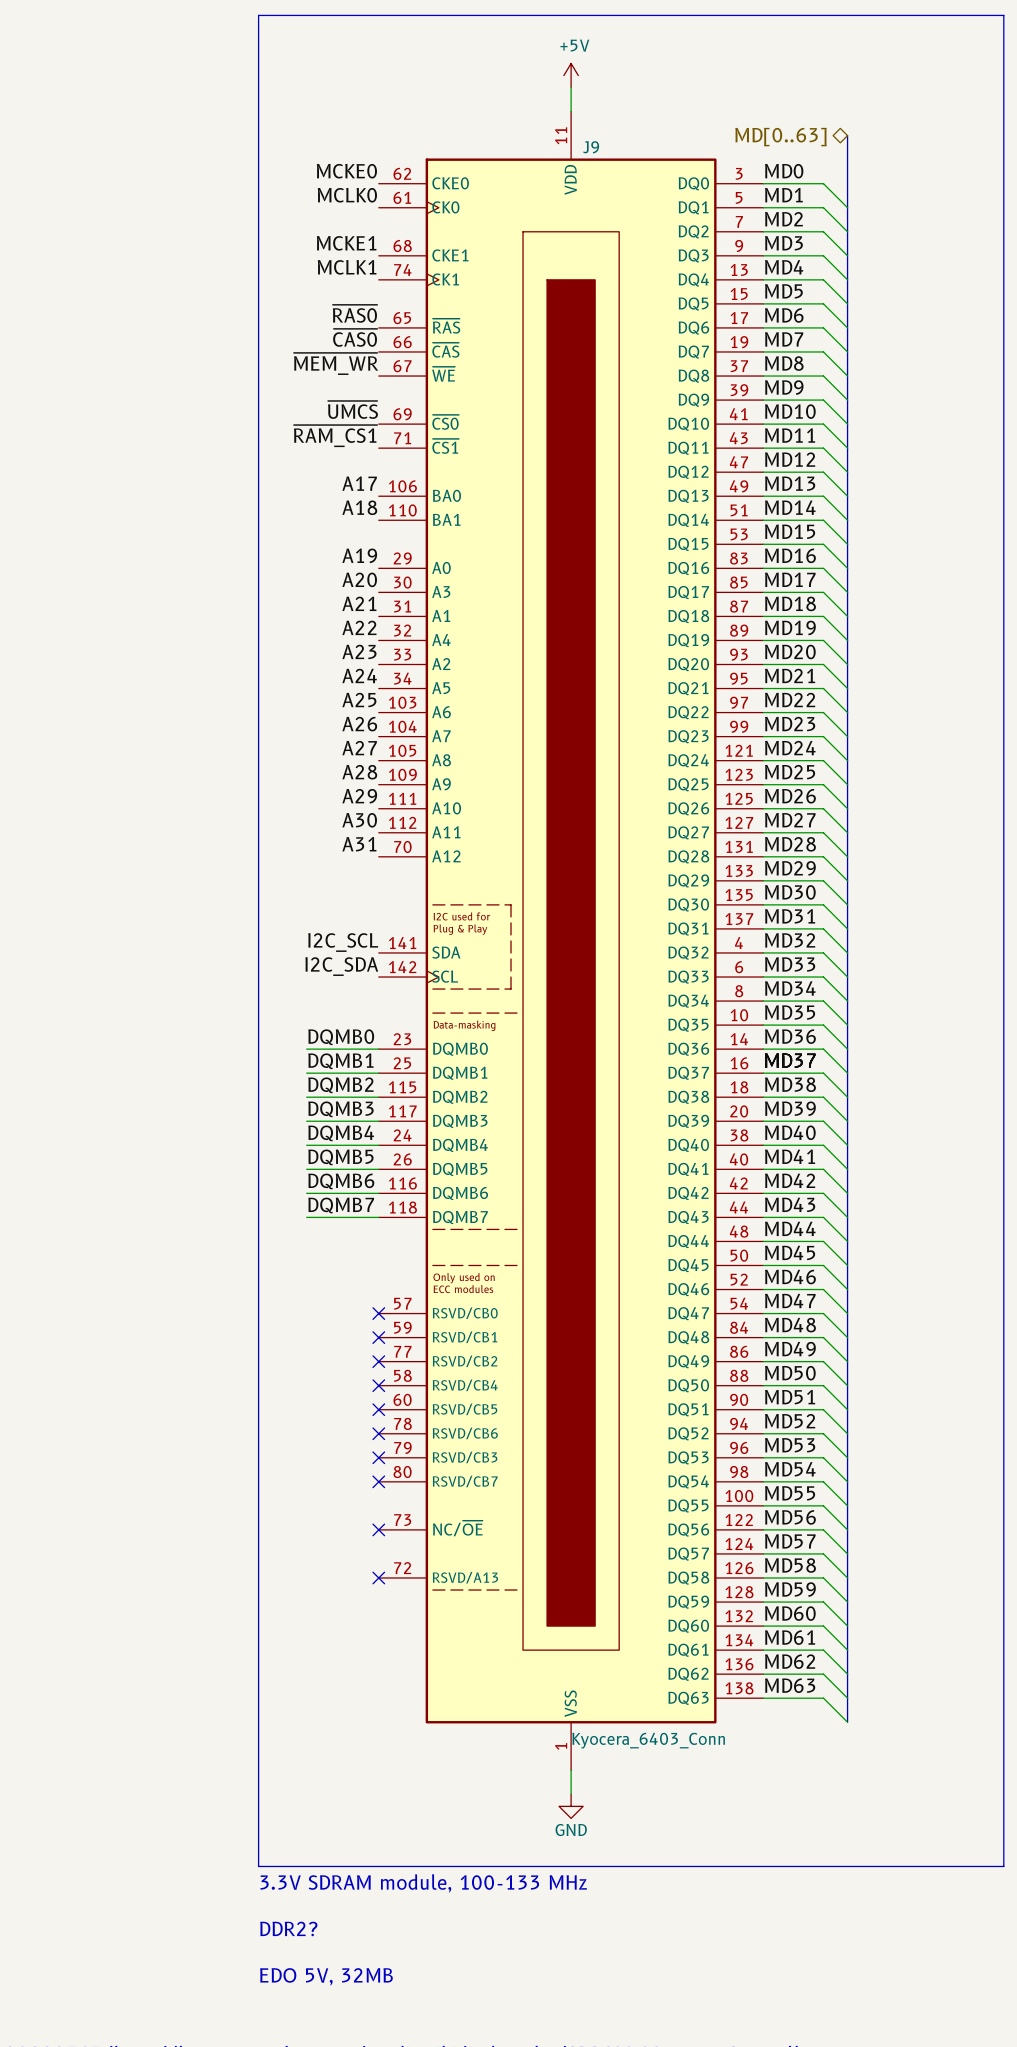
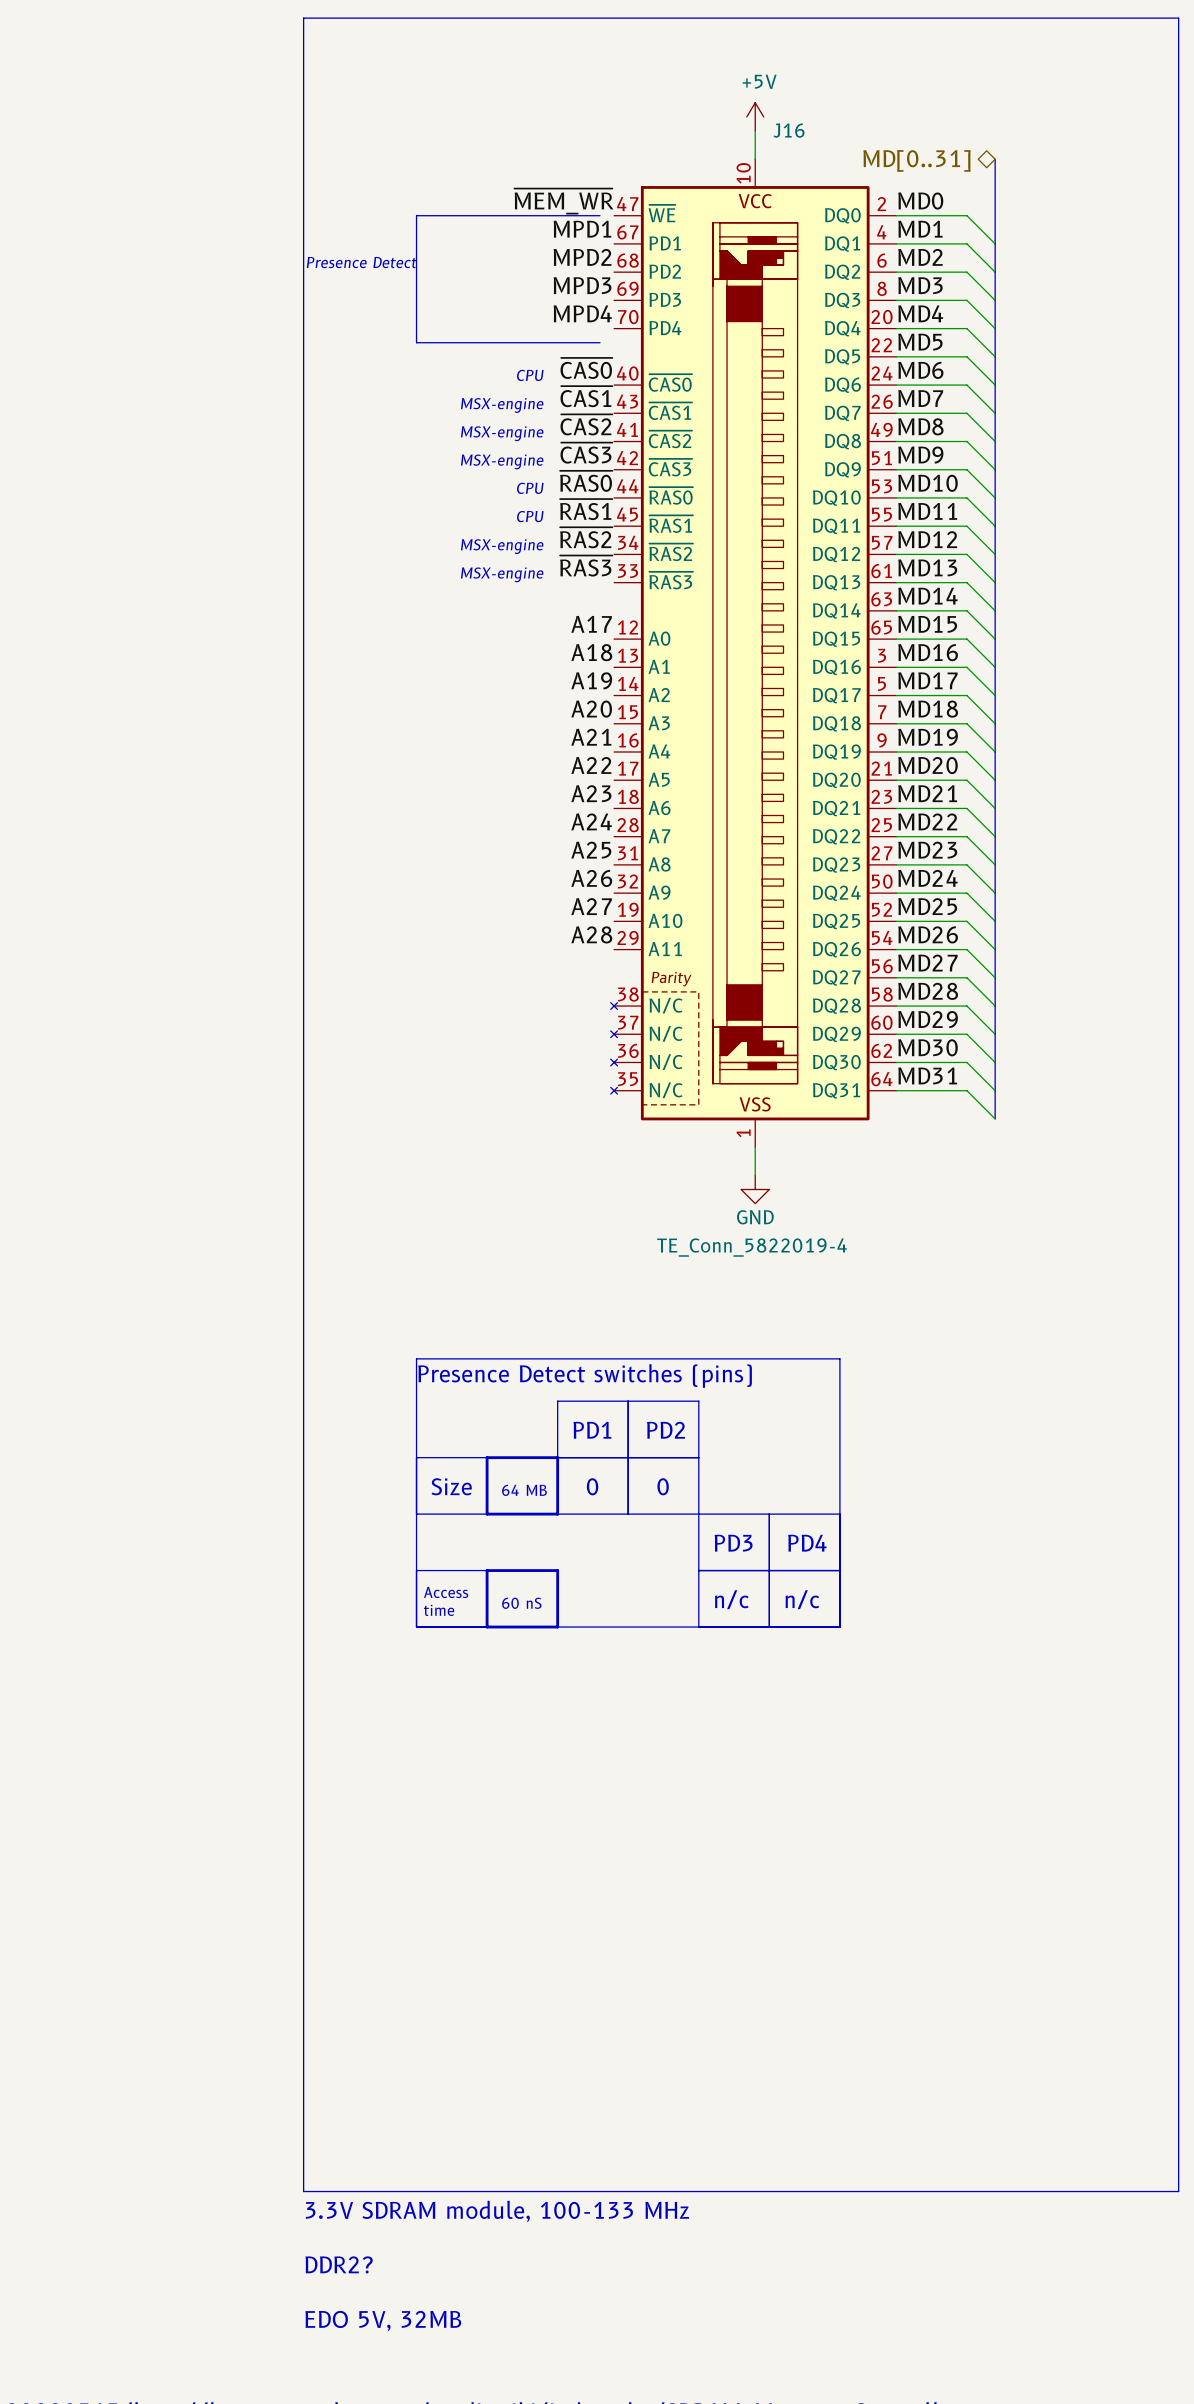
power symbol position: +5V (571, 75) -> +5V (755, 116)
wire: (571, 87) (571, 111) -> (755, 131) (755, 159)
hierarchical label: MD[0..63] (780, 137) -> MD[0..31] (917, 160)
label: MCKE0 (346, 171) -> none
label: none -> ~{MEM_WR} (563, 201)
line: none -> (599, 215) (416, 215) (416, 342) (599, 342)
label: MCLK0 (347, 195) -> none
label: none -> MPD1 (582, 229)
label: none -> MPD2 (582, 257)
text: none -> Presence Detect (361, 262)
label: MCKE1 (346, 243) -> none
label: none -> MPD3 (582, 285)
label: MCLK1 (347, 267) -> none
label: none -> MPD4 (582, 313)
label position: ~{RAS0} (355, 313) -> ~{RAS0} (586, 481)
text: none -> CPU (530, 375)
label position: ~{CAS0} (355, 337) -> ~{CAS0} (586, 368)
label: none -> ~{CAS1} (586, 396)
text: none -> MSX-engine (502, 405)
label: none -> ~{CAS2} (586, 424)
label: ~{MEM_WR} (336, 363) -> none
text: none -> MSX-engine (502, 433)
label: none -> ~{CAS3} (586, 453)
text: none -> MSX-engine (502, 461)
label: ~{UMCS} (352, 409) -> none
text: none -> CPU (530, 488)
label: none -> ~{RAS1} (586, 509)
label: ~{RAM_CS1} (335, 436) -> none
text: none -> CPU (530, 516)
label: none -> ~{RAS2} (586, 537)
text: none -> MSX-engine (502, 546)
label: none -> ~{RAS3} (586, 566)
label position: A17 (359, 483) -> A17 (591, 624)
text: none -> MSX-engine (502, 574)
label position: A18 (359, 507) -> A18 (591, 652)
label position: A19 (359, 555) -> A19 (591, 680)
J16: none -> TE_Conn_5822019-4 (753, 653)
label position: A20 (359, 579) -> A20 (591, 709)
label position: A21 (359, 603) -> A21 (591, 737)
label position: A22 (359, 627) -> A22 (591, 765)
label position: A23 (359, 651) -> A23 (591, 793)
label position: A24 (359, 675) -> A24 (591, 821)
label position: A25 (359, 699) -> A25 (591, 850)
label position: A26 (359, 724) -> A26 (591, 878)
label position: A27 (359, 748) -> A27 (591, 906)
label position: A28 (359, 772) -> A28 (591, 934)
label: A29 (359, 796) -> none
label: A30 (359, 820) -> none
label: A31 (359, 844) -> none
J9: Kyocera_6403_Conn (571, 940) -> none
label: MD32 (790, 940) -> none
label: I2C_SCL (343, 942) -> none
wire: (763, 952) (823, 952) (847, 977) -> none
bus: (847, 952) (847, 1722) -> none
label: MD33 (790, 964) -> none
label: I2C_SDA (341, 966) -> none
wire: (763, 977) (823, 977) (847, 1001) -> none
label: MD34 (790, 988) -> none
wire: (763, 1001) (823, 1001) (847, 1025) -> none
label: MD35 (790, 1012) -> none
power symbol: none -> GND (755, 1189)
wire: (763, 1025) (823, 1025) (847, 1049) -> none
label: MD36 (790, 1036) -> none
label: DQMB0 (341, 1037) -> none
wire: (306, 1049) (378, 1049) -> none
wire: (763, 1049) (823, 1049) (847, 1073) -> none
label: MD37 (790, 1060) -> none
label: DQMB1 (340, 1061) -> none
wire: (306, 1073) (378, 1073) -> none
wire: (763, 1073) (823, 1073) (847, 1097) -> none
label: MD38 (790, 1084) -> none
label: DQMB2 (340, 1085) -> none
wire: (306, 1097) (378, 1097) -> none
wire: (763, 1097) (823, 1097) (847, 1121) -> none
label: MD39 (790, 1108) -> none
label: DQMB3 (340, 1109) -> none
wire: (306, 1121) (378, 1121) -> none
wire: (763, 1121) (823, 1121) (847, 1145) -> none
label: MD40 (790, 1132) -> none
label: DQMB4 (341, 1133) -> none
wire: (306, 1145) (378, 1145) -> none
wire: (763, 1145) (823, 1145) (847, 1169) -> none
label: MD41 (790, 1156) -> none
label: DQMB5 (340, 1157) -> none
line: none -> (416, 1358) (416, 1627) (839, 1627) (839, 1358) (416, 1358)
wire: (306, 1169) (378, 1169) -> none
wire: (763, 1169) (823, 1169) (847, 1193) -> none
text: none -> Presence Detect switches (pins) (585, 1376)
label: MD42 (790, 1180) -> none
label: DQMB6 (341, 1181) -> none
wire: (306, 1193) (378, 1193) -> none
line: none -> (628, 1401) (628, 1514)
wire: (763, 1193) (823, 1193) (847, 1217) -> none
label: MD43 (790, 1204) -> none
label: DQMB7 (341, 1205) -> none
wire: (306, 1217) (378, 1217) -> none
wire: (763, 1217) (823, 1217) (847, 1241) -> none
text: none -> PD1 PD2 (629, 1430)
label: MD44 (790, 1228) -> none
line: none -> (416, 1457) (487, 1457)
line: none -> (487, 1457) (557, 1457)
line: none -> (487, 1457) (487, 1514)
line: none -> (557, 1457) (698, 1457)
line: none -> (557, 1457) (557, 1514)
wire: (763, 1241) (823, 1241) (847, 1265) -> none
label: MD45 (790, 1252) -> none
wire: (763, 1265) (823, 1265) (847, 1289) -> none
text: none -> Size (451, 1486)
text: none -> 0 (592, 1486)
text: none -> 0 (663, 1486)
text: none -> 64 MB (524, 1490)
label: MD46 (790, 1277) -> none
line: none -> (416, 1514) (487, 1514)
line: none -> (487, 1514) (557, 1514)
line: none -> (557, 1514) (839, 1514)
line: none -> (557, 1514) (557, 1401) (698, 1401) (698, 1627)
line: none -> (769, 1514) (769, 1627)
wire: (763, 1289) (823, 1289) (847, 1313) -> none
label: MD47 (790, 1300) -> none
no-connect mark: (378, 1313) -> none
wire: (763, 1313) (823, 1313) (847, 1337) -> none
text: none -> PD3 PD4 (770, 1543)
label: MD48 (790, 1325) -> none
line: none -> (416, 1570) (487, 1570)
no-connect mark: (378, 1337) -> none
line: none -> (487, 1570) (487, 1627)
line: none -> (487, 1570) (557, 1570) (557, 1627) (487, 1627)
line: none -> (698, 1570) (839, 1570)
wire: (763, 1337) (823, 1337) (847, 1361) -> none
label: MD49 (790, 1349) -> none
text: none -> Access (446, 1592)
no-connect mark: (378, 1361) -> none
wire: (763, 1361) (823, 1361) (847, 1385) -> none
text: none -> n/c (731, 1599)
text: none -> n/c (802, 1599)
text: none -> 60 nS (521, 1603)
text: none -> time (439, 1610)
label: MD50 (790, 1373) -> none
no-connect mark: (378, 1385) -> none
wire: (763, 1385) (823, 1385) (847, 1409) -> none
label: MD51 (790, 1397) -> none
no-connect mark: (378, 1409) -> none
wire: (763, 1409) (823, 1409) (847, 1433) -> none
label: MD52 (790, 1421) -> none
no-connect mark: (378, 1433) -> none
wire: (763, 1433) (823, 1433) (847, 1457) -> none
label: MD53 (790, 1445) -> none
no-connect mark: (378, 1457) -> none
wire: (763, 1457) (823, 1457) (847, 1481) -> none
label: MD54 (790, 1469) -> none
no-connect mark: (378, 1481) -> none
wire: (763, 1481) (823, 1481) (847, 1505) -> none
label: MD55 (790, 1493) -> none
wire: (763, 1505) (823, 1505) (847, 1529) -> none
label: MD56 (790, 1517) -> none
no-connect mark: (378, 1529) -> none
wire: (763, 1529) (823, 1529) (847, 1553) -> none
label: MD57 (790, 1541) -> none
wire: (763, 1553) (823, 1553) (847, 1578) -> none
label: MD58 (790, 1565) -> none
no-connect mark: (378, 1578) -> none
wire: (763, 1578) (823, 1578) (847, 1602) -> none
label: MD59 (790, 1589) -> none
wire: (763, 1602) (823, 1602) (847, 1626) -> none
label: MD60 (790, 1613) -> none
wire: (763, 1626) (823, 1626) (847, 1650) -> none
label: MD61 (790, 1637) -> none
wire: (763, 1650) (823, 1650) (847, 1674) -> none
label: MD62 (790, 1661) -> none
wire: (763, 1674) (823, 1674) (847, 1698) -> none
label: MD63 (790, 1685) -> none
wire: (763, 1698) (823, 1698) (847, 1722) -> none
wire: (571, 1770) (571, 1794) -> none
power symbol: GND (571, 1806) -> none

